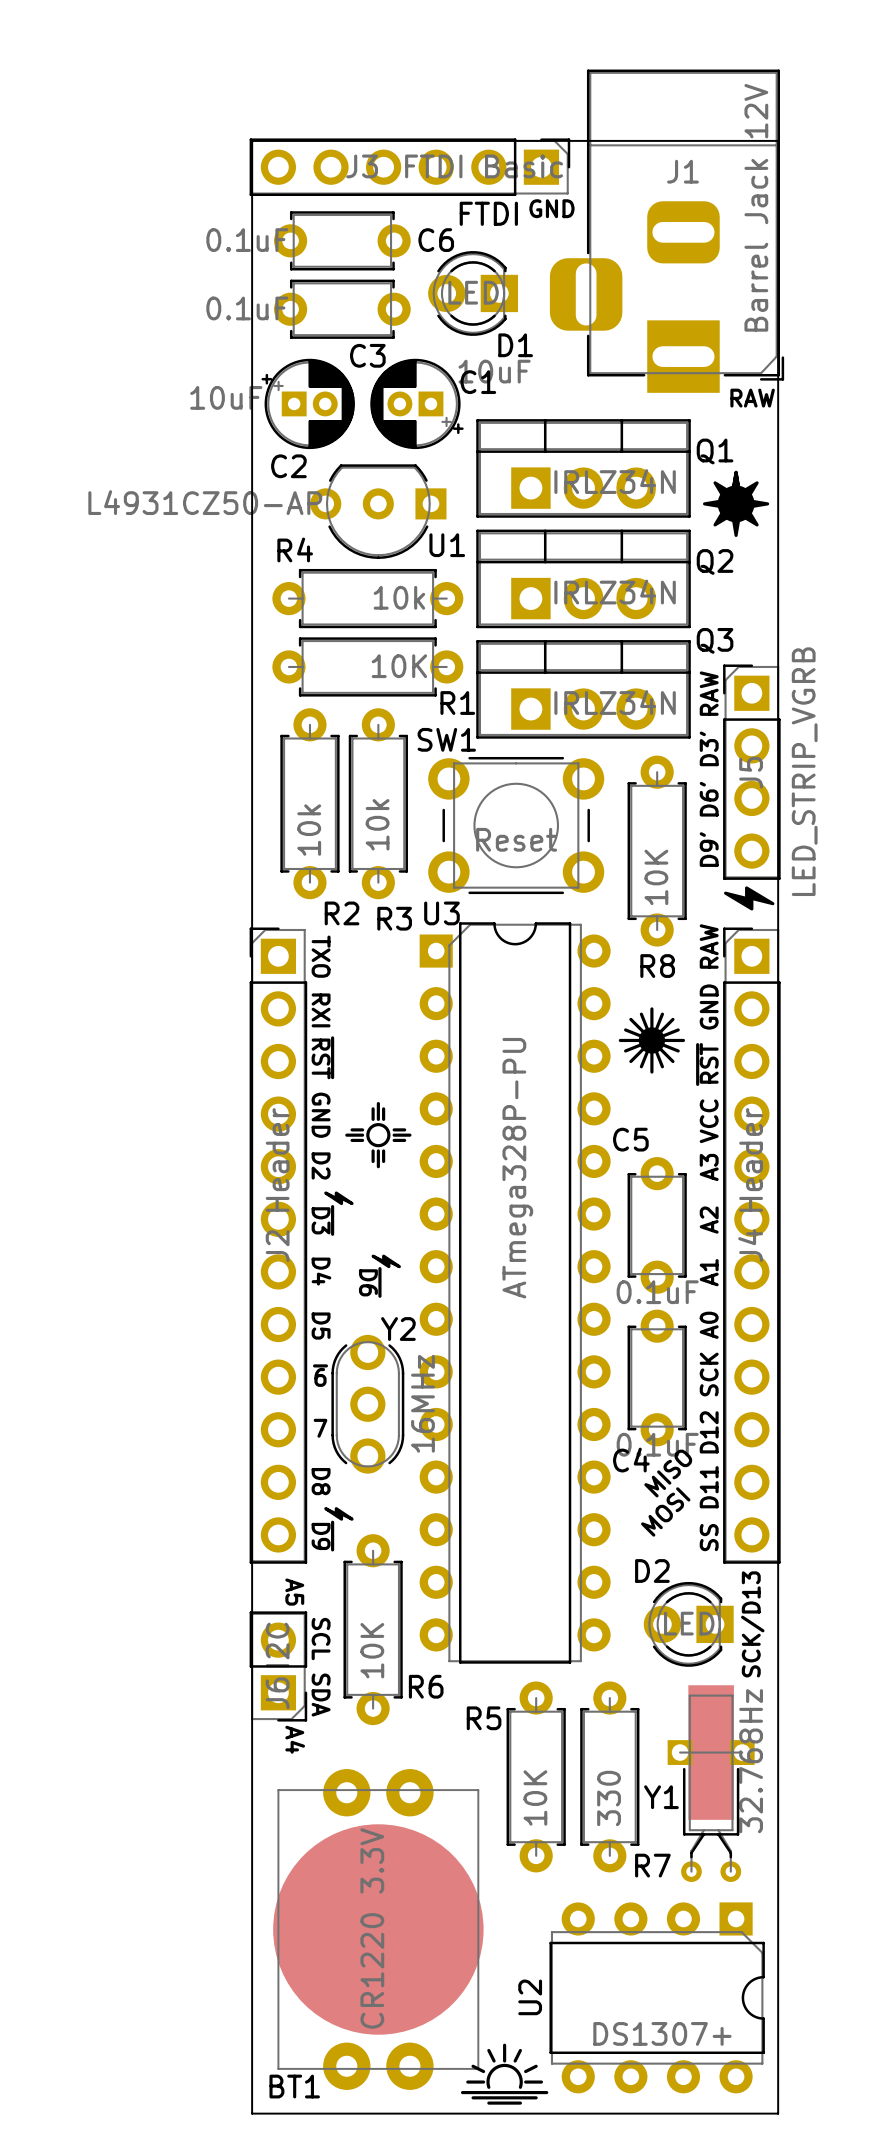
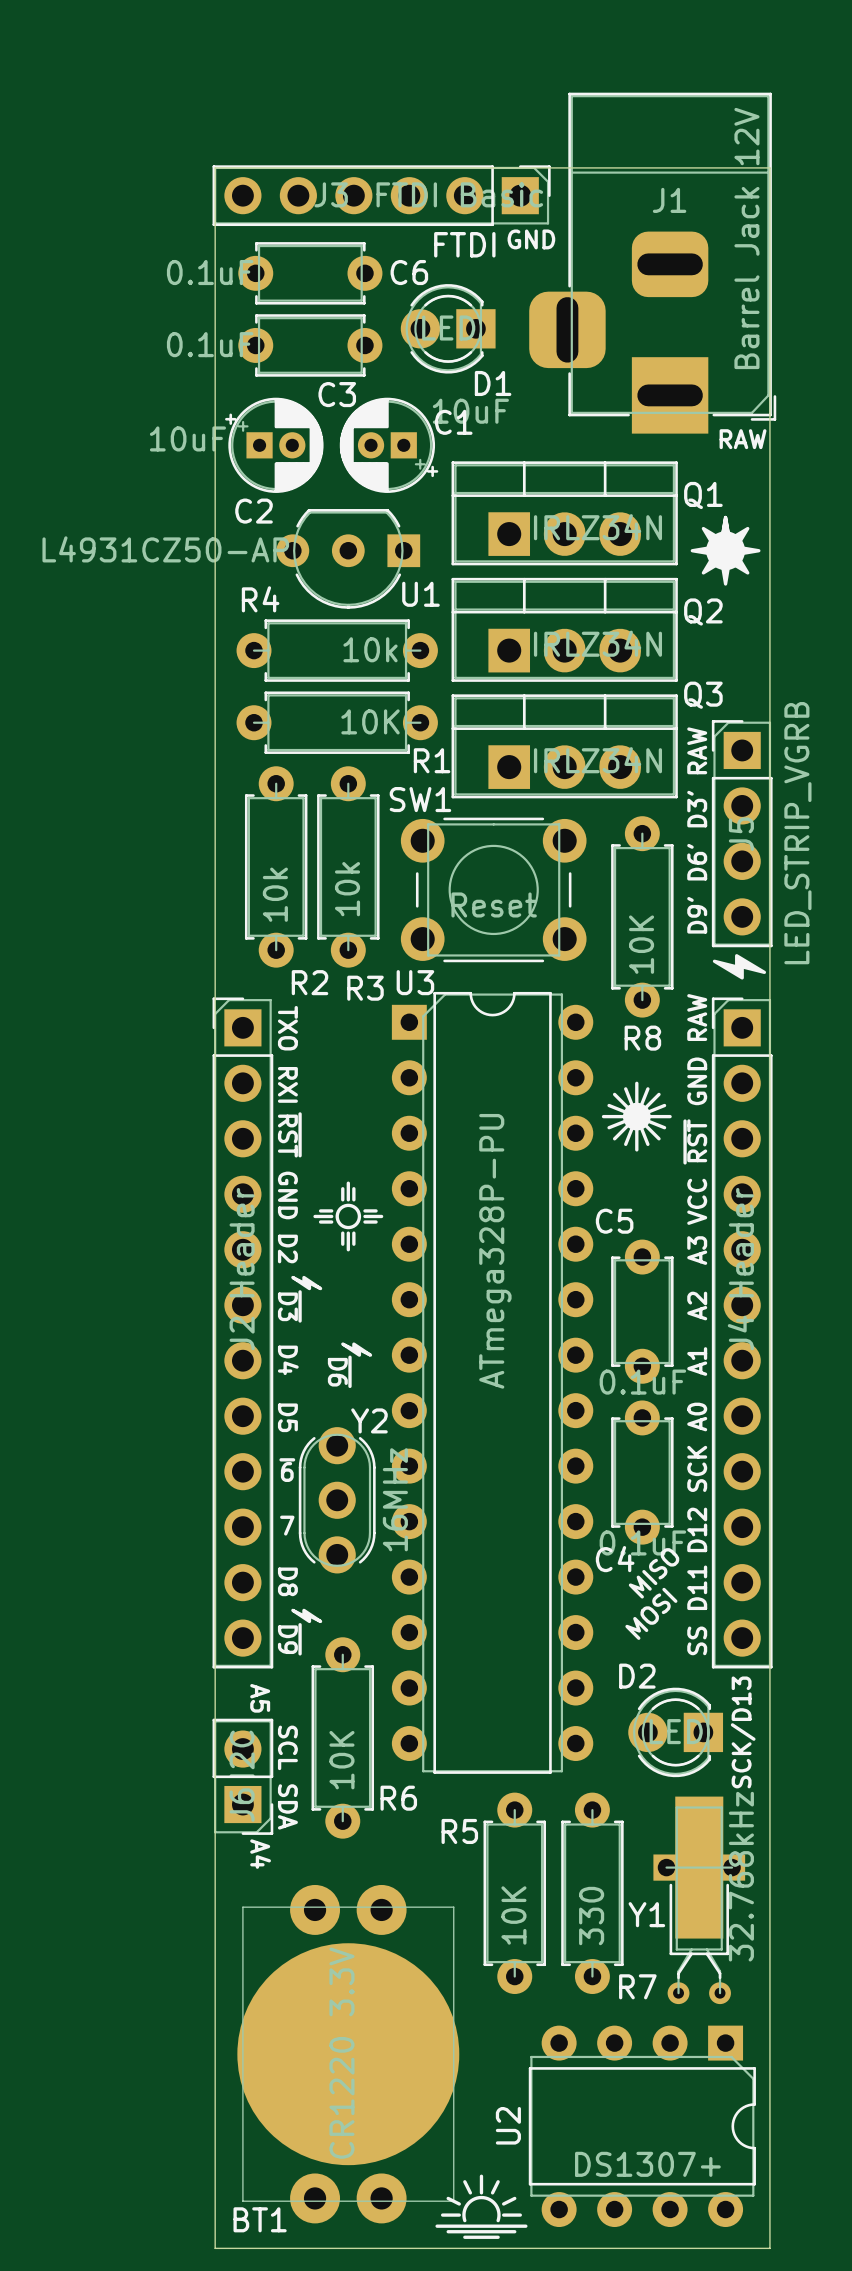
Y1 value: 32.768Hz (751, 1761) -> 32.768kHz (741, 1876)

